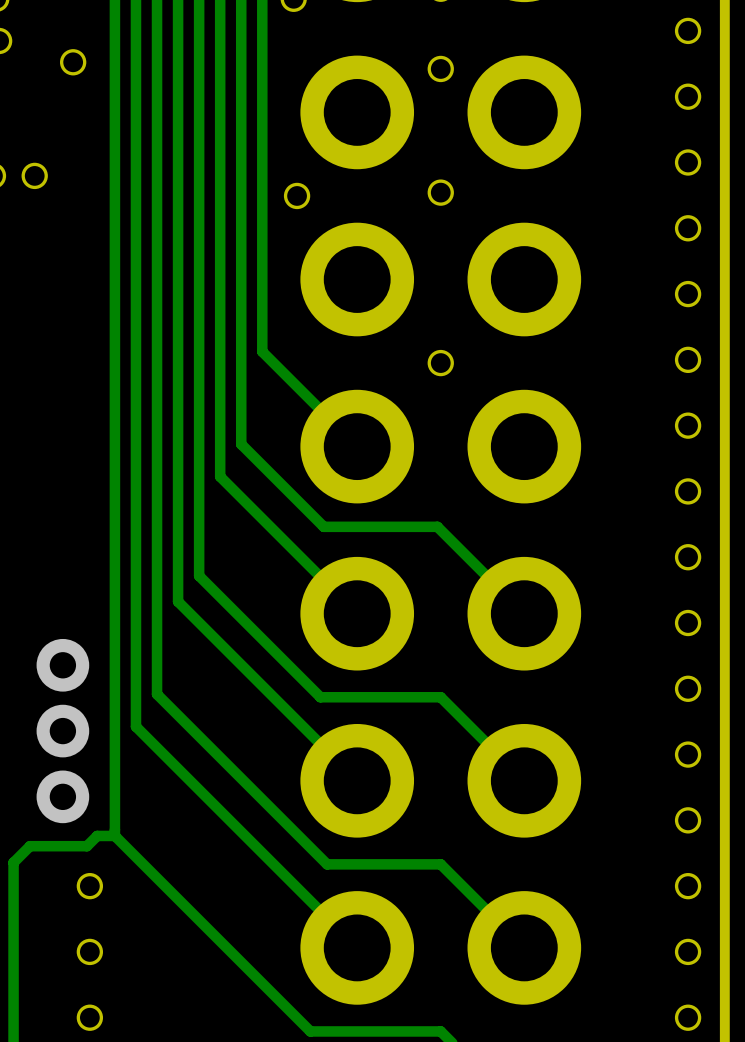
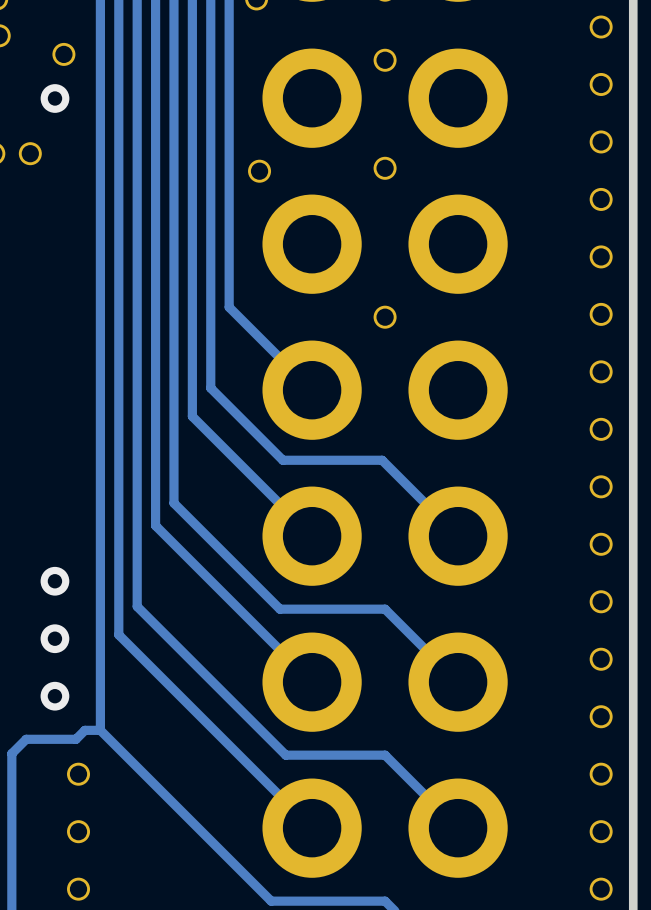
via: none -> (55, 98)
via size: [36, 638, 90, 692] -> [40, 566, 70, 596]
via size: [36, 704, 90, 758] -> [40, 624, 70, 654]
via size: [36, 770, 90, 824] -> [40, 681, 70, 711]

